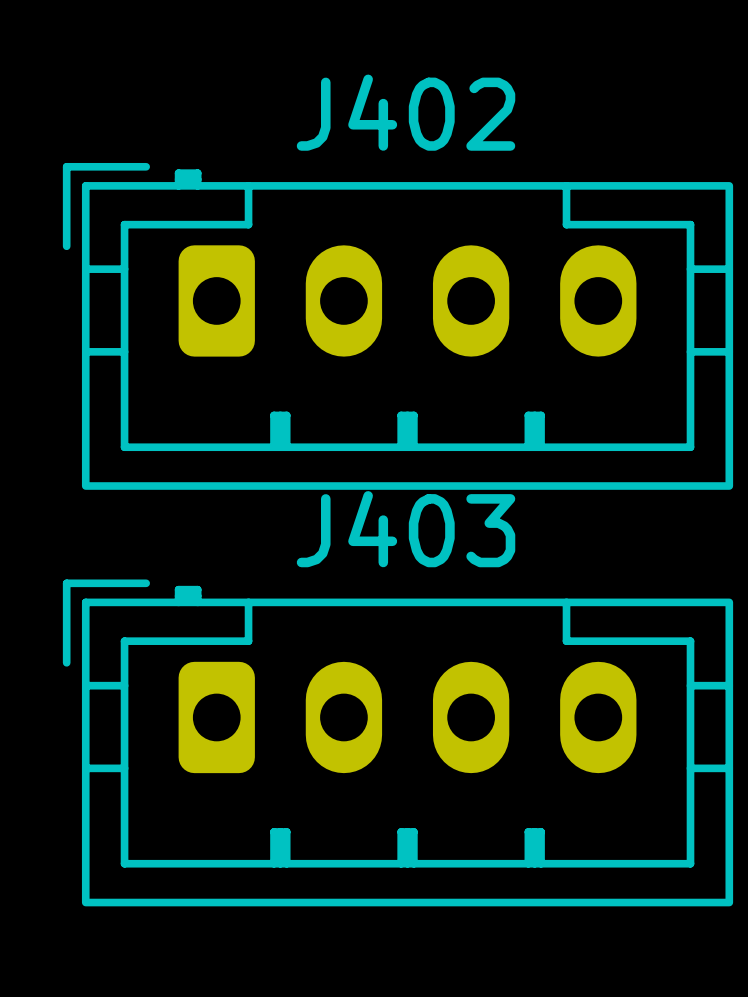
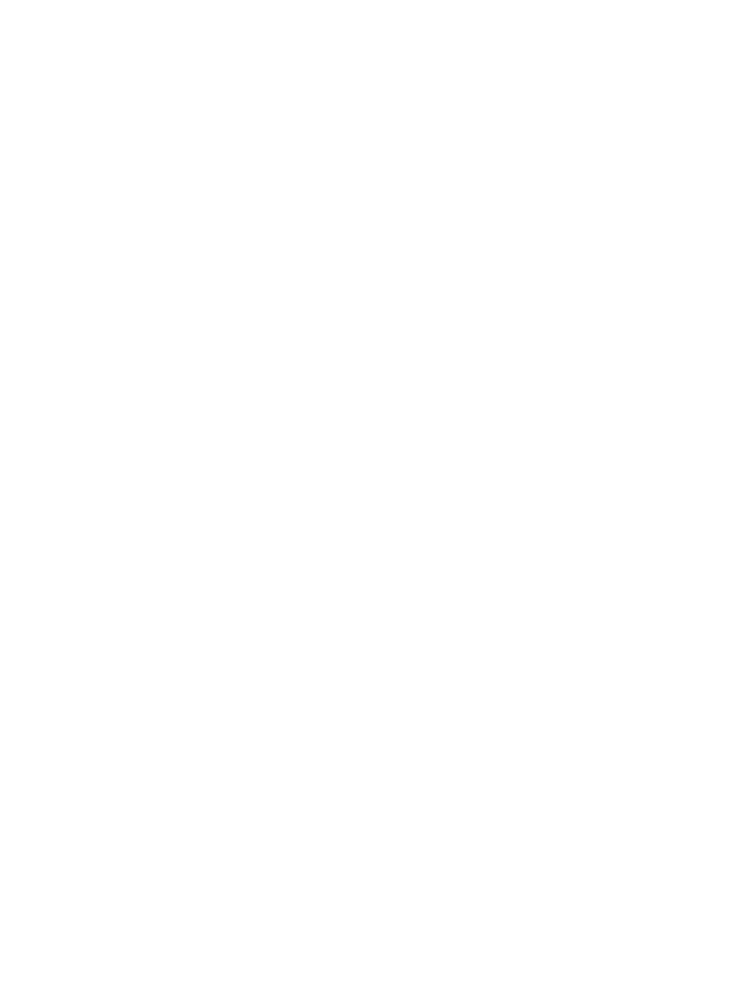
J402: (397, 326) -> none
J403: (397, 742) -> none

